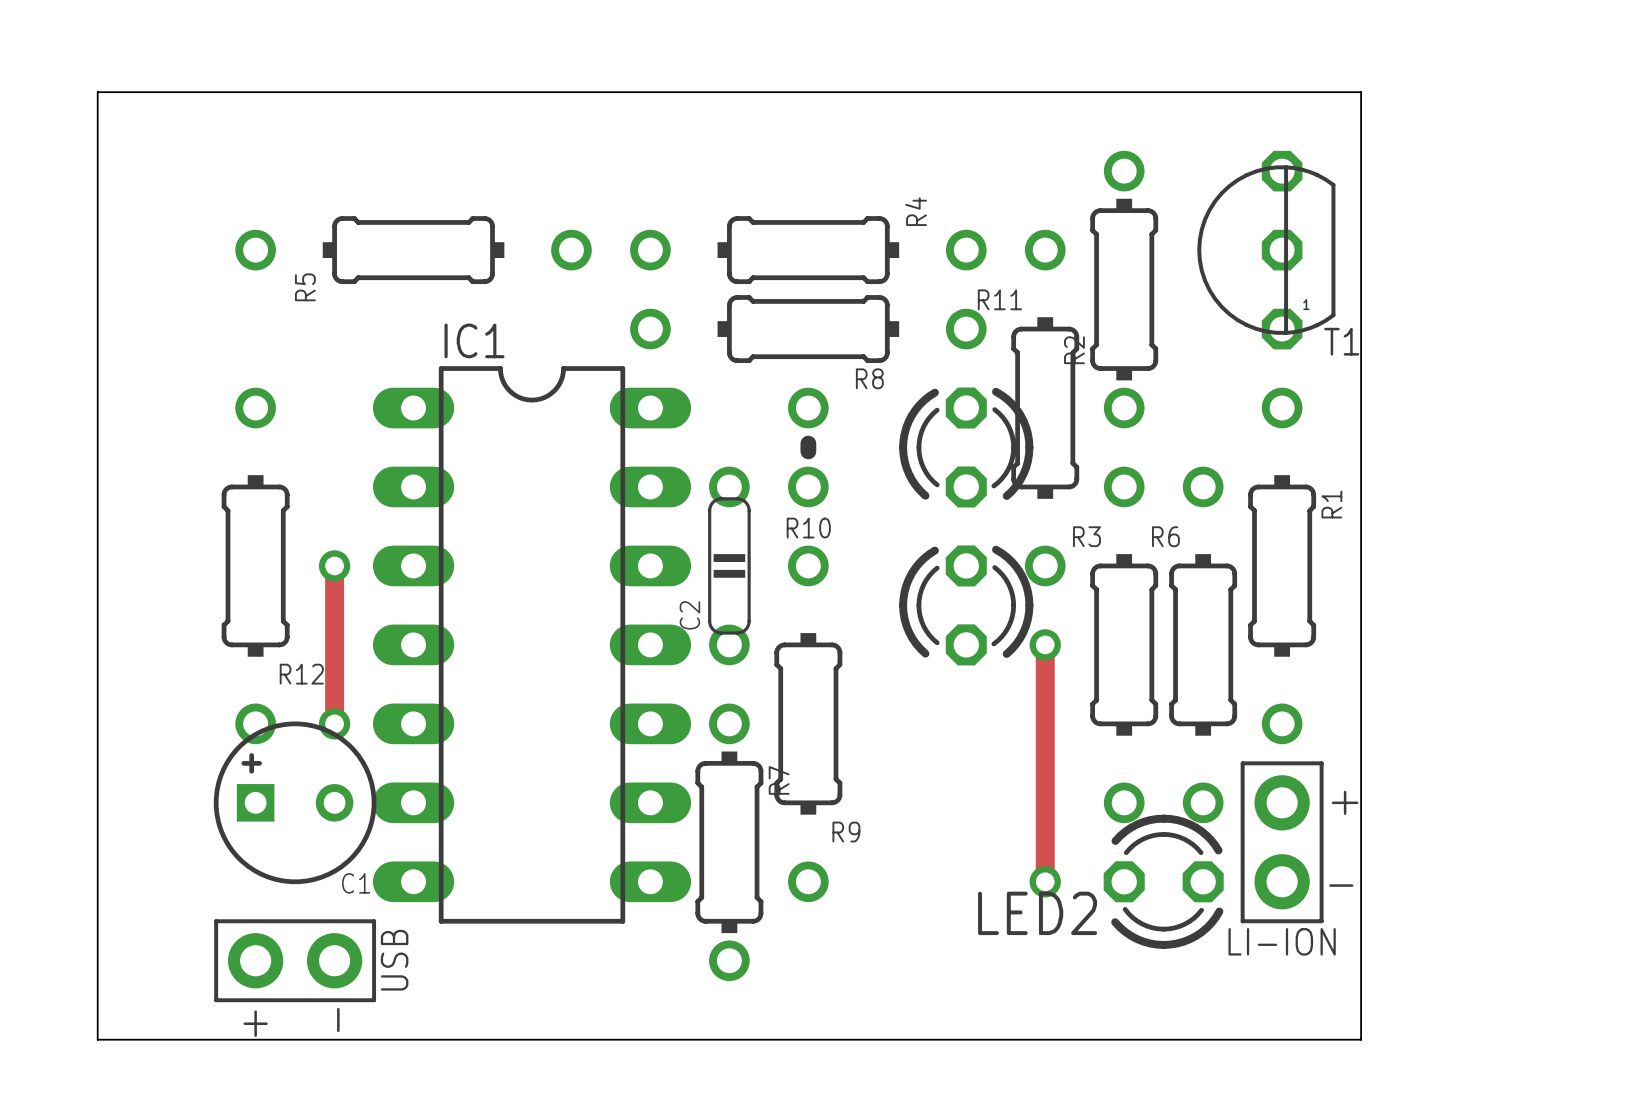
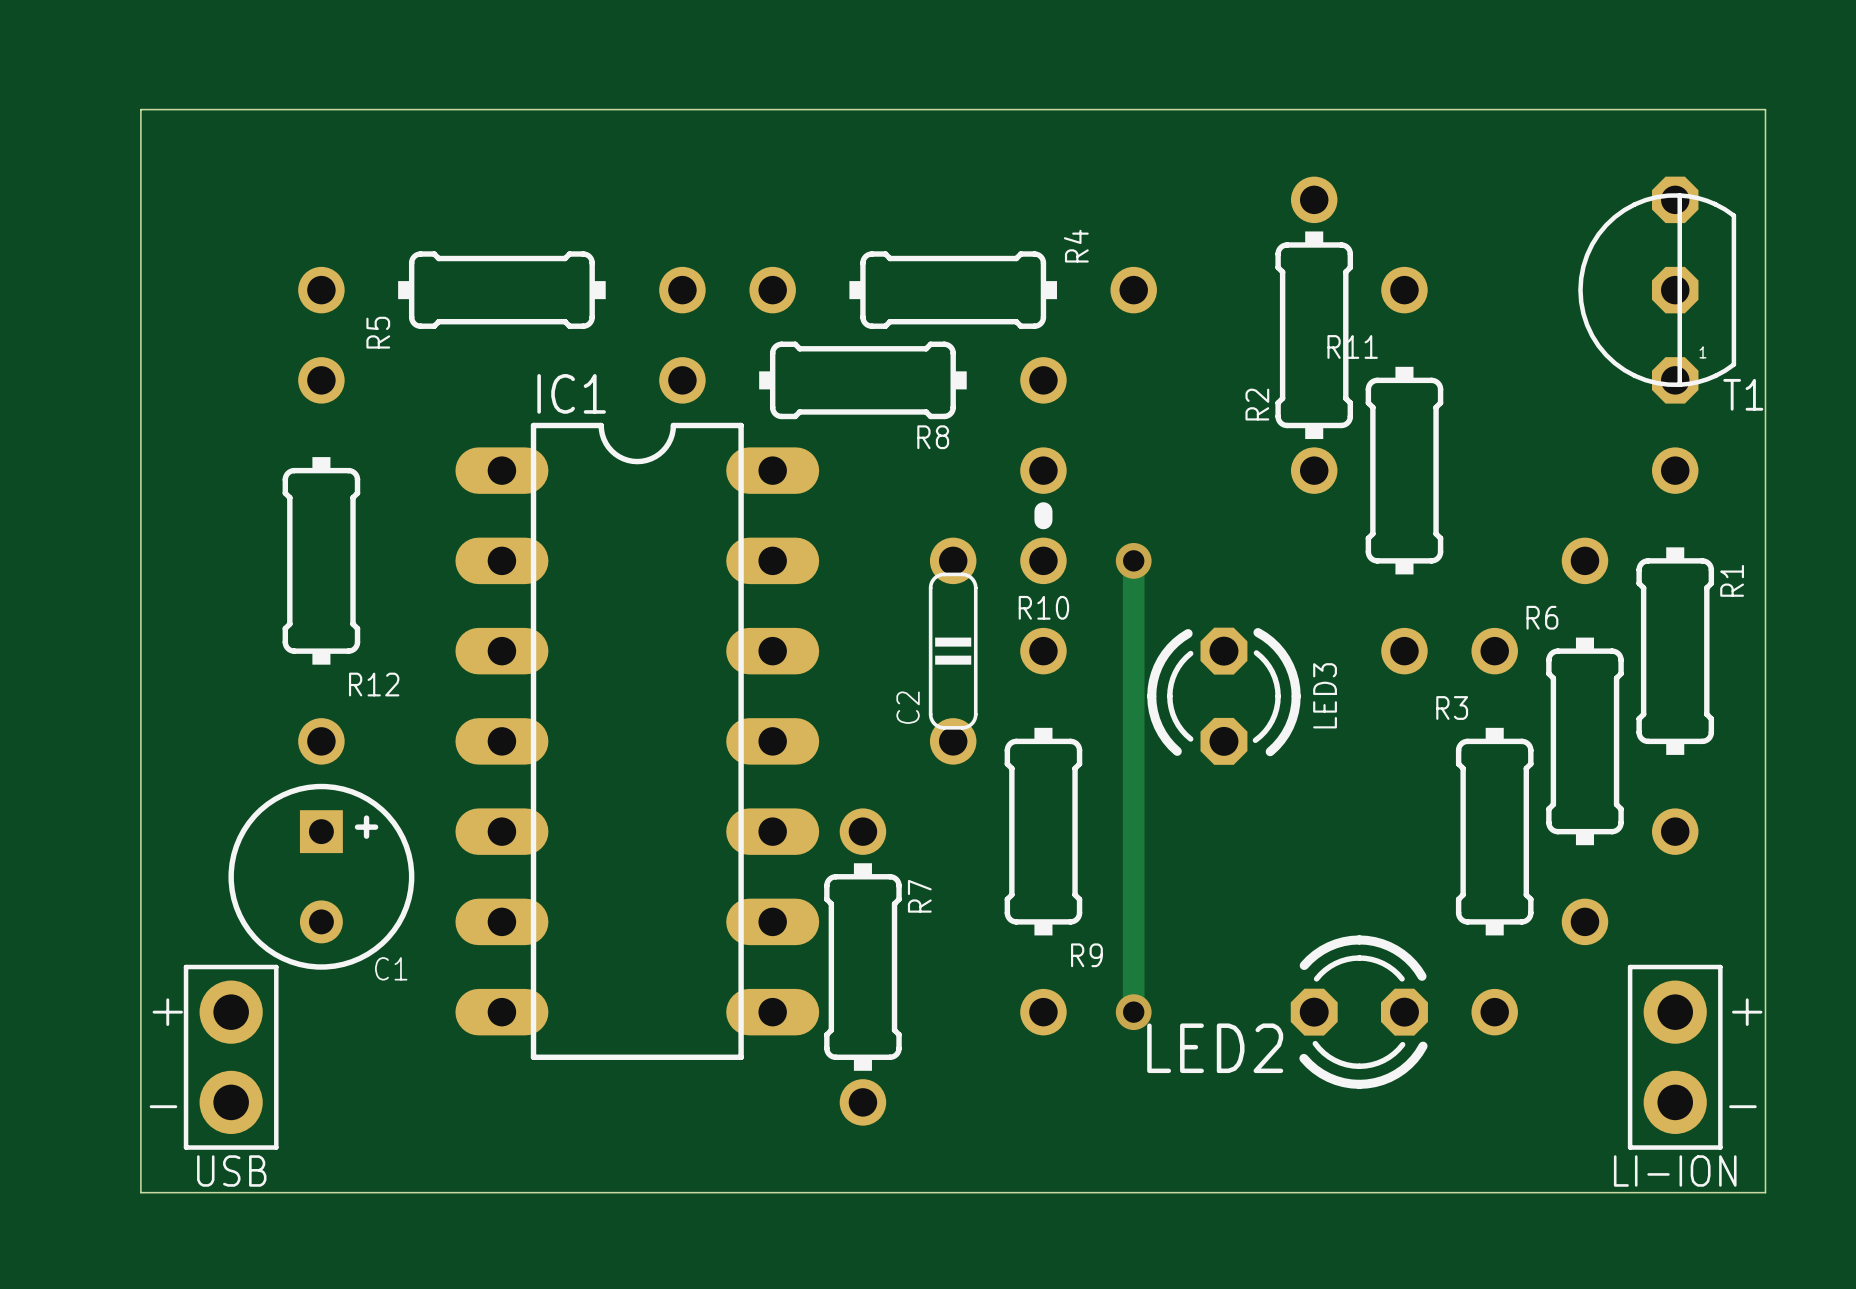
board edge: (1361, 92) (1361, 1039) -> (1584, 109) (1765, 109) (1765, 1192) (1584, 1192)
T1 position: (1266, 250) -> (1657, 290)
R8 position: (808, 329) -> (862, 380)
R11 position: (1045, 408) -> (1404, 470)
R10 position: (808, 447) -> (1043, 515)
part: (966, 447) -> none
track: none -> (1133, 560) (1133, 1012)
via: none -> (1133, 560)
R12 position: (255, 565) -> (321, 560)
track: (334, 565) (334, 723) -> none
via: (334, 565) -> none
C2 position: (729, 565) -> (953, 651)
R1 position: (1282, 565) -> (1675, 651)
part: (966, 605) -> none
LED3: none -> (1223, 696)
track: (1045, 644) (1045, 881) -> none
via: (1045, 644) -> none
R3 position: (1124, 644) -> (1494, 831)
R6 position: (1203, 644) -> (1584, 741)
via: (334, 723) -> none
R9 position: (808, 723) -> (1043, 831)
C1 rotation: 0° (295, 802) -> 90° clockwise (321, 876)
LI-ION position: (1282, 842) -> (1675, 1057)
via position: (1045, 881) -> (1133, 1012)
USB: none -> (231, 1057)
USB: (295, 960) -> none

